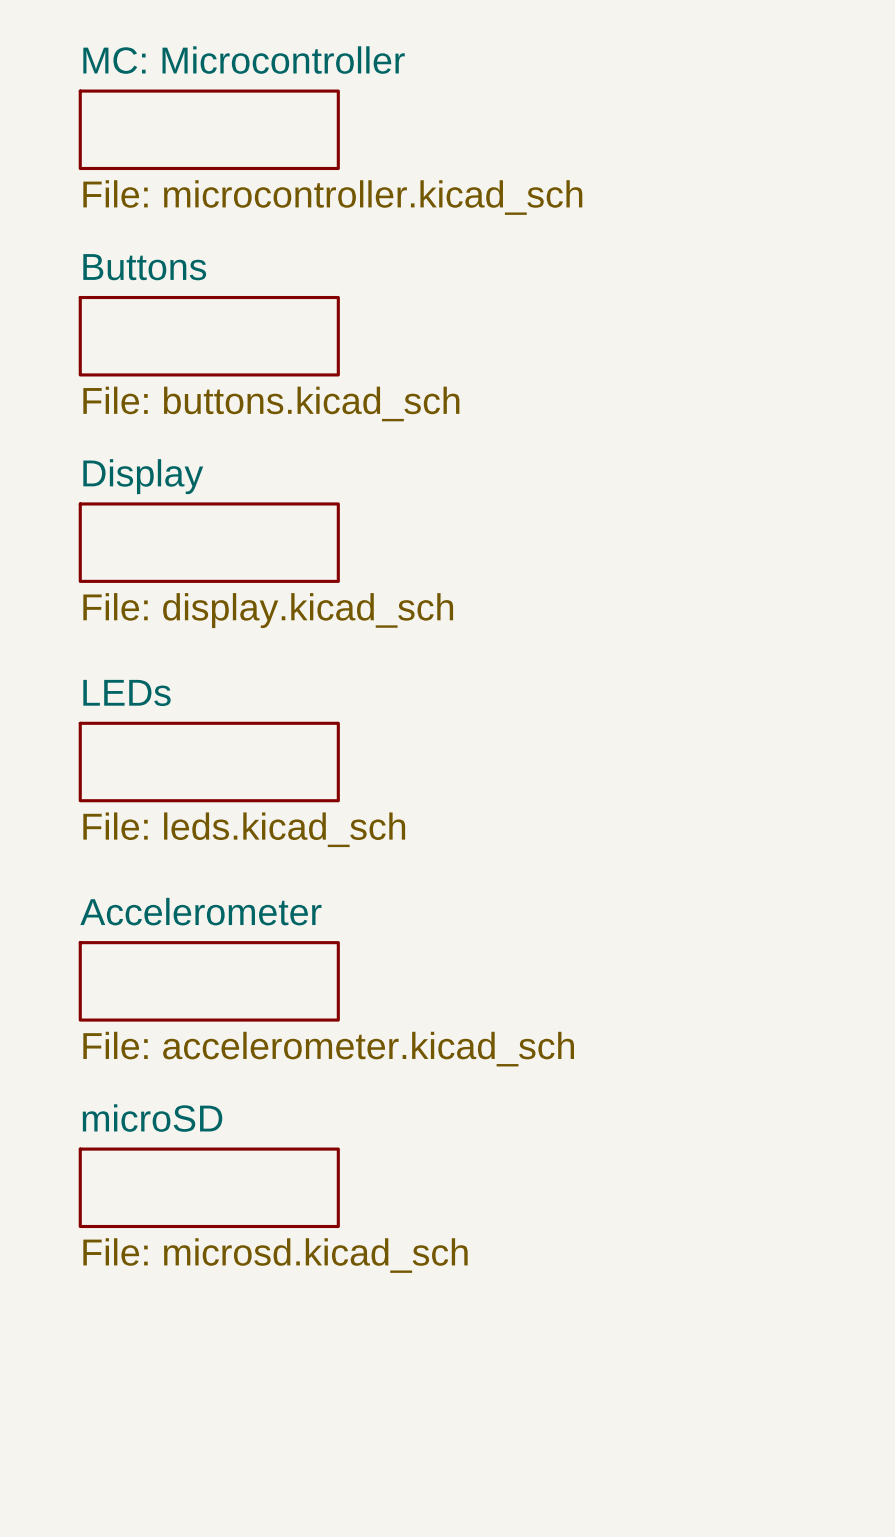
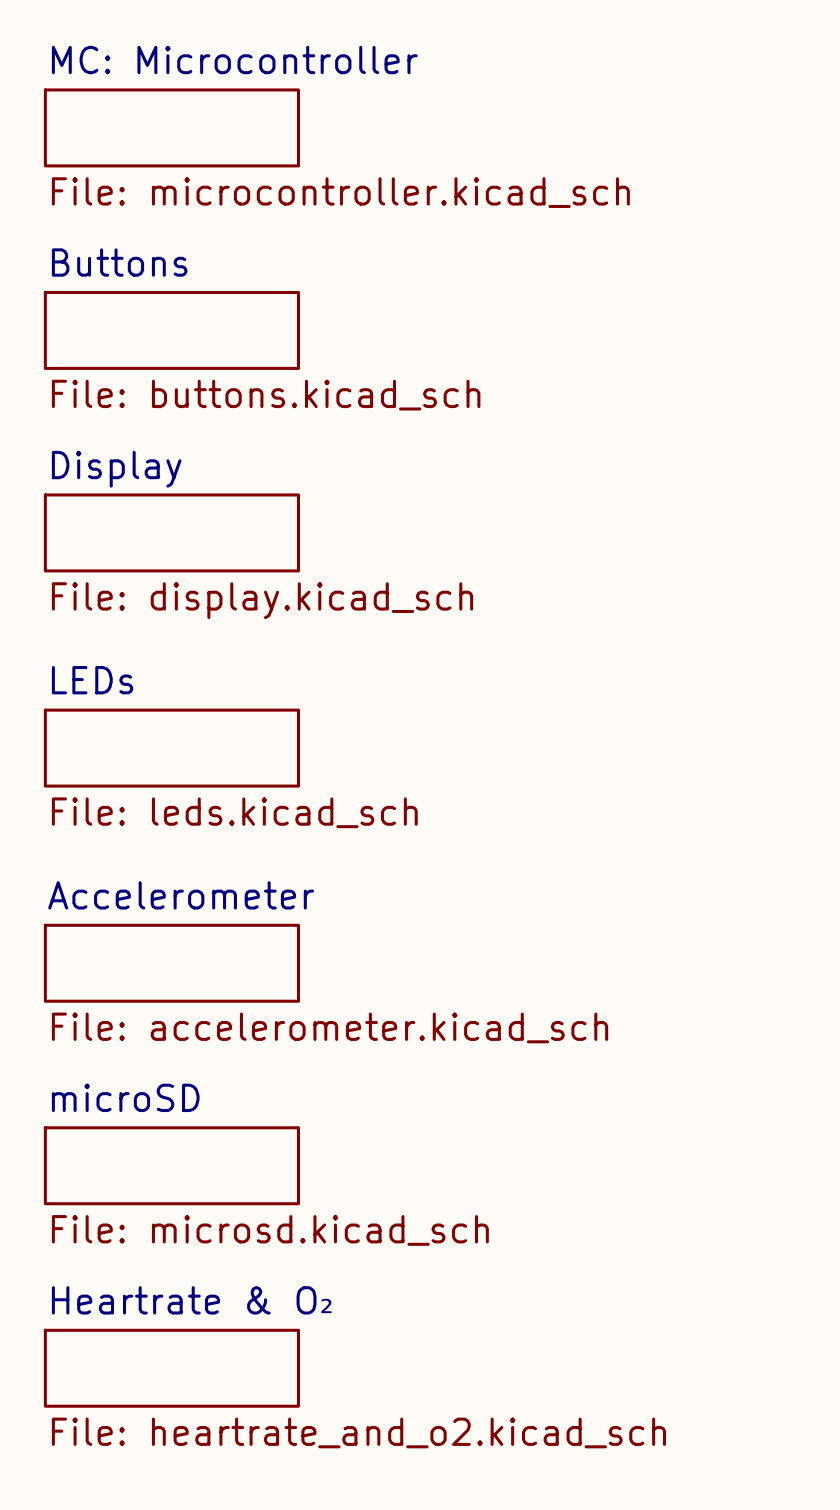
sheet Heartrate & O₂: none -> File: heartrate_and_o2.kicad_sch (171, 1368)

